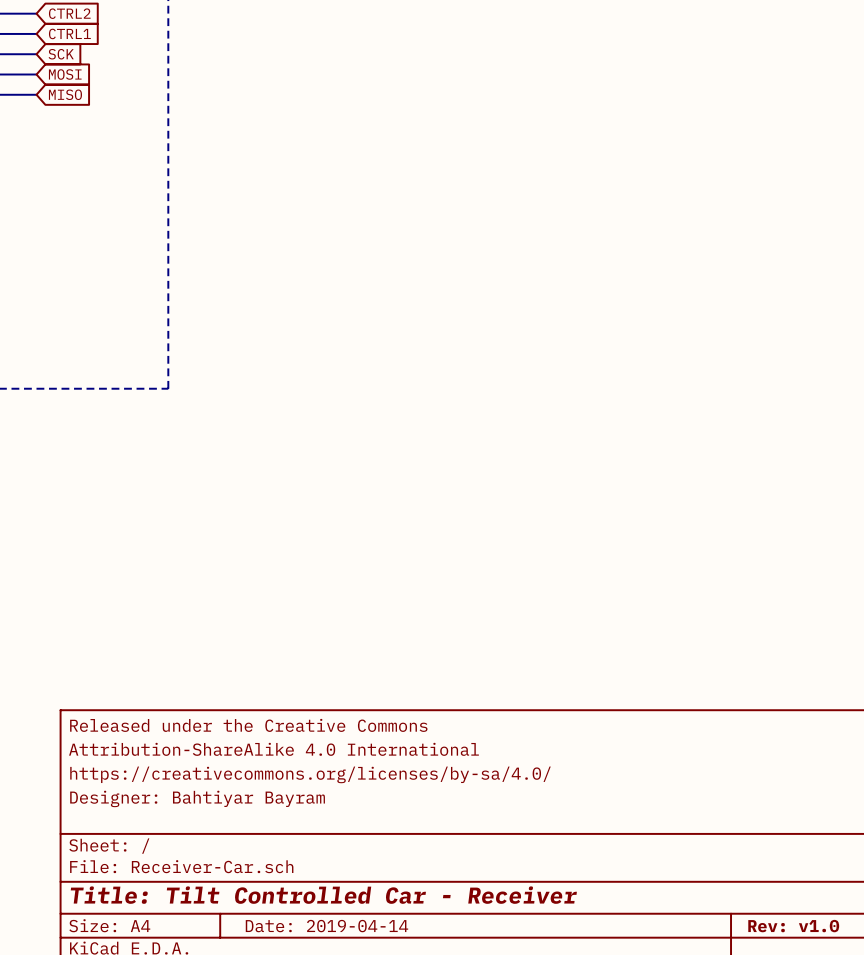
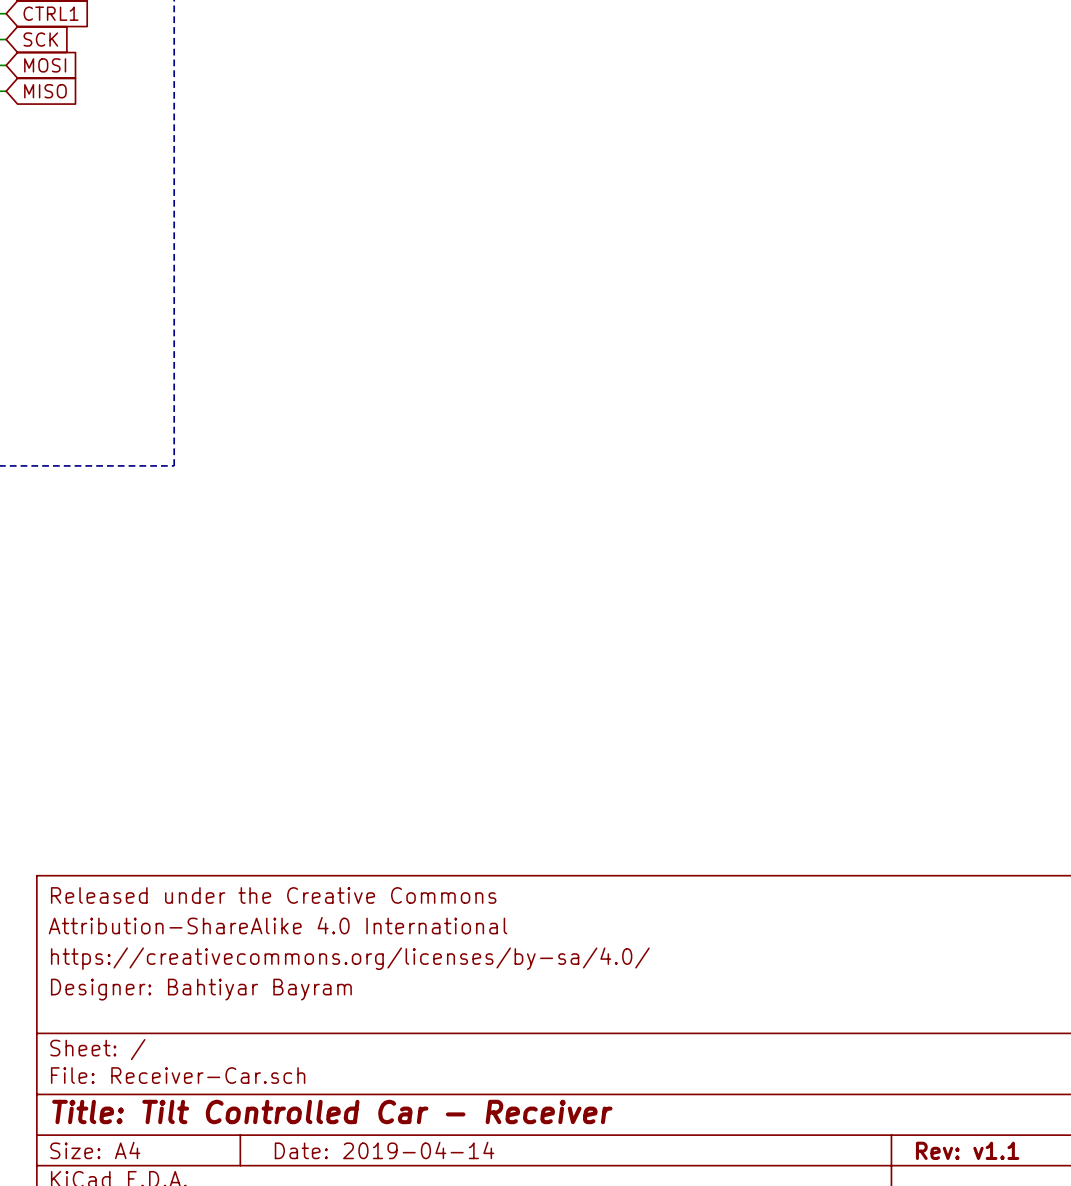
title block: Rev: v1.0 (793, 926) -> Rev: v1.1 (967, 1150)

